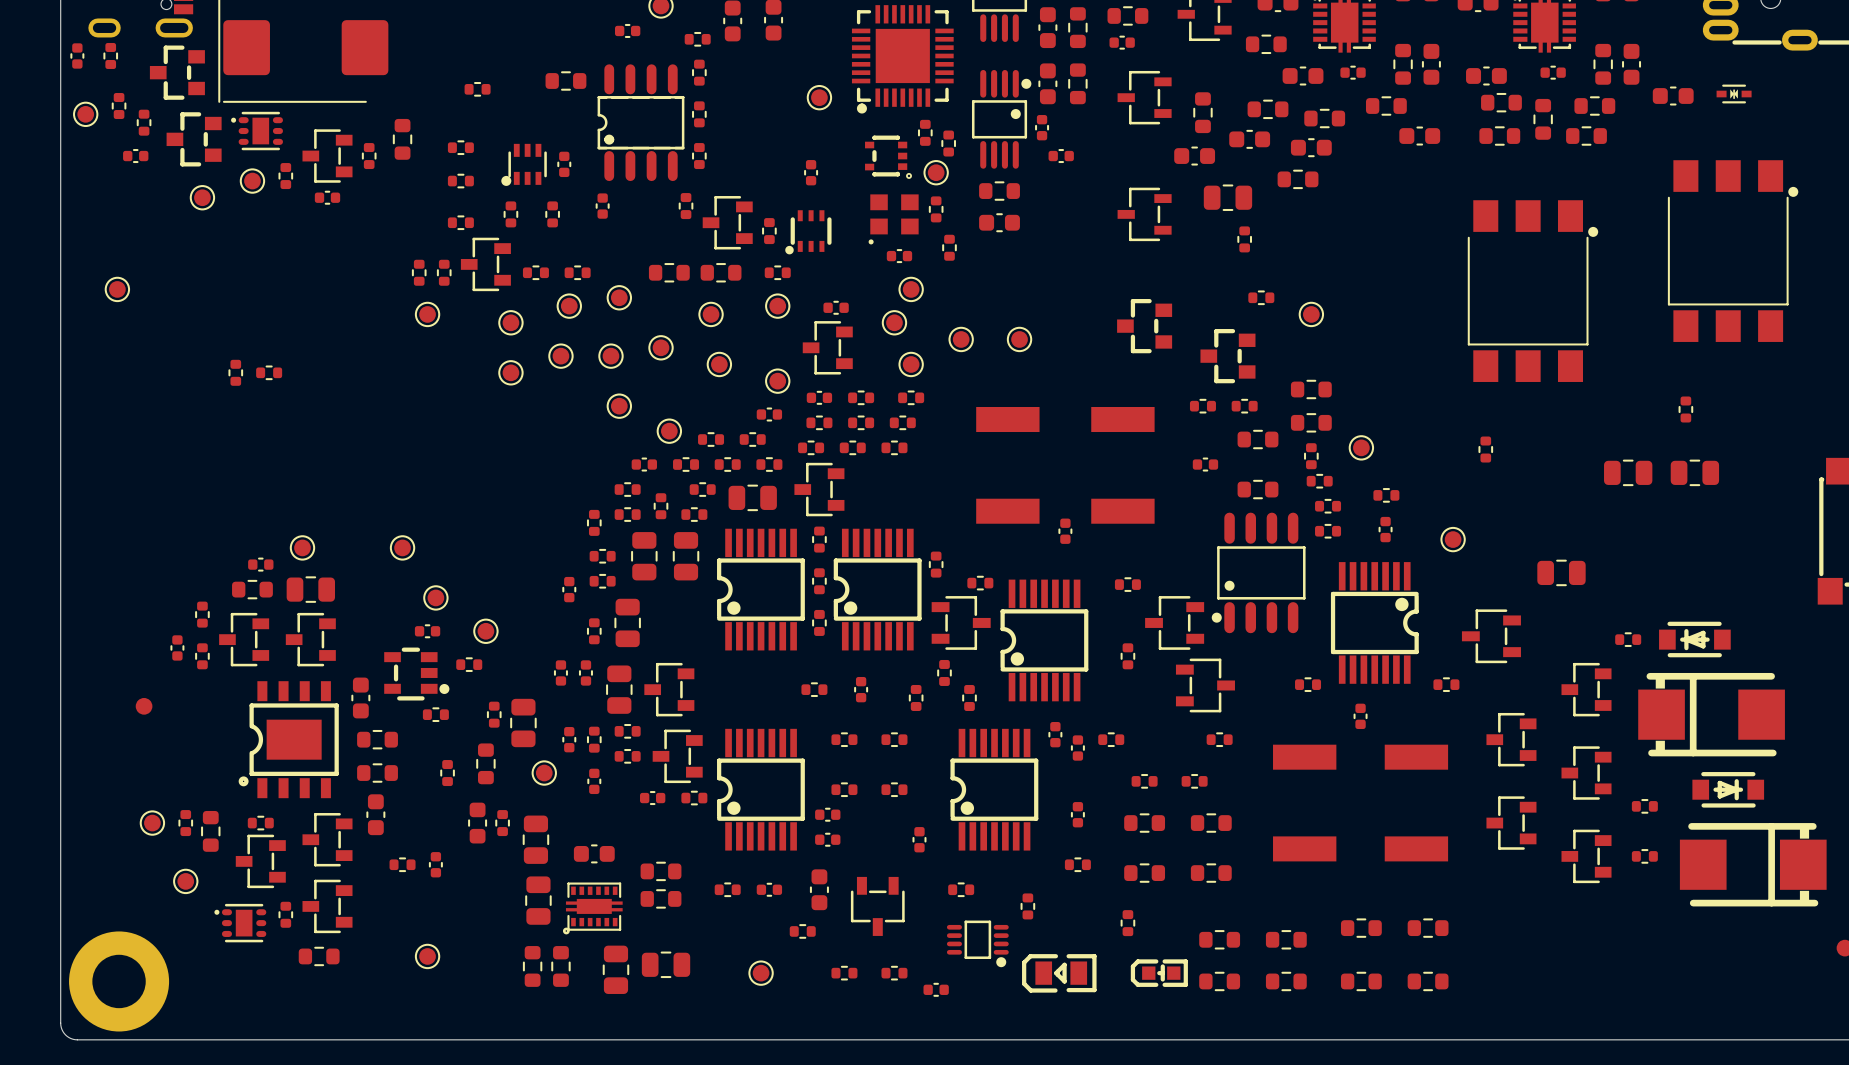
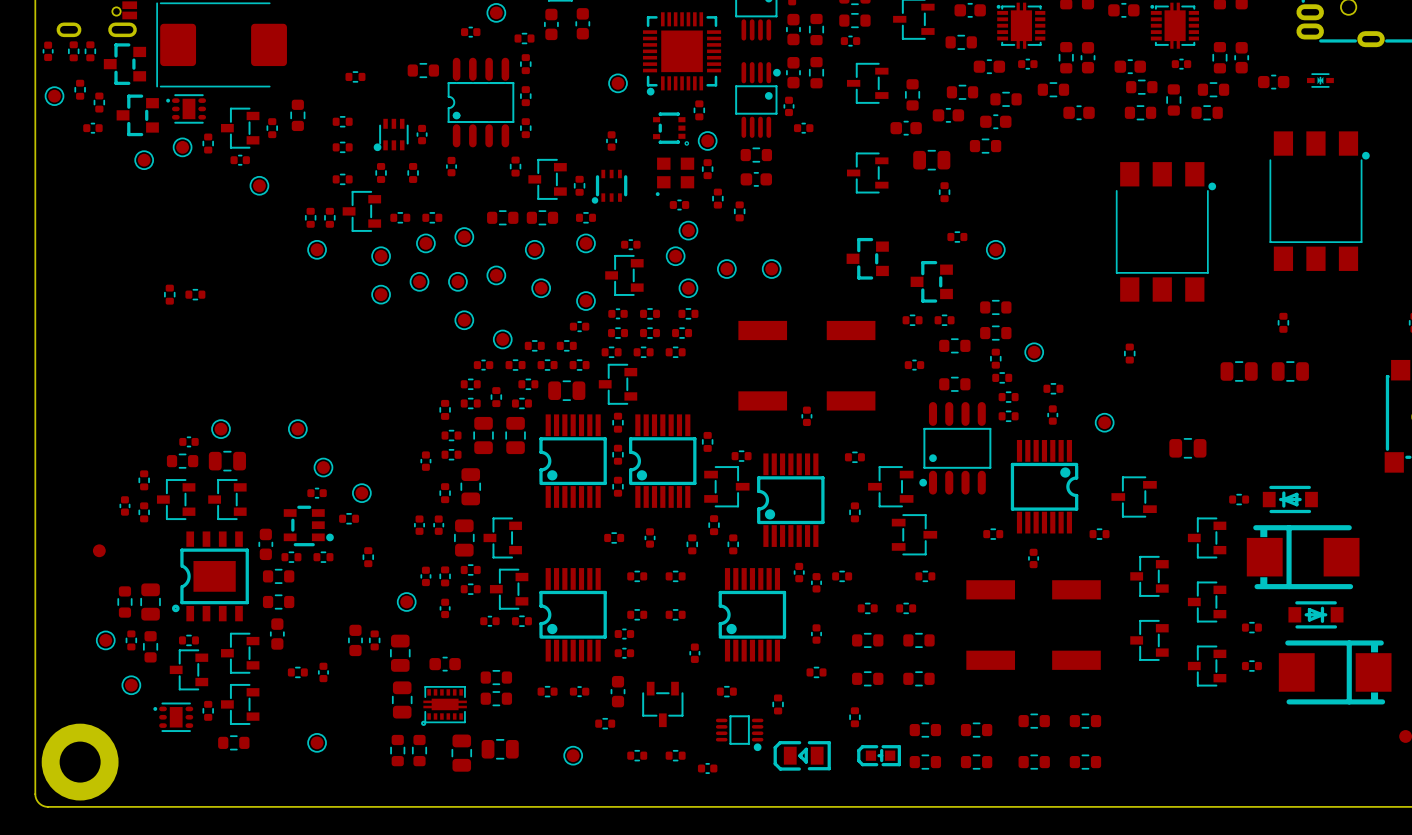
part: none -> (90, 51)
part position: (948, 143) -> (739, 211)
part: none -> (259, 185)
part: (117, 289) -> none
part position: (523, 723) -> (150, 602)
part position: (485, 763) -> (124, 602)
part rotation: 0° (447, 773) -> 90° clockwise (291, 557)
part position: (447, 773) -> (291, 557)

